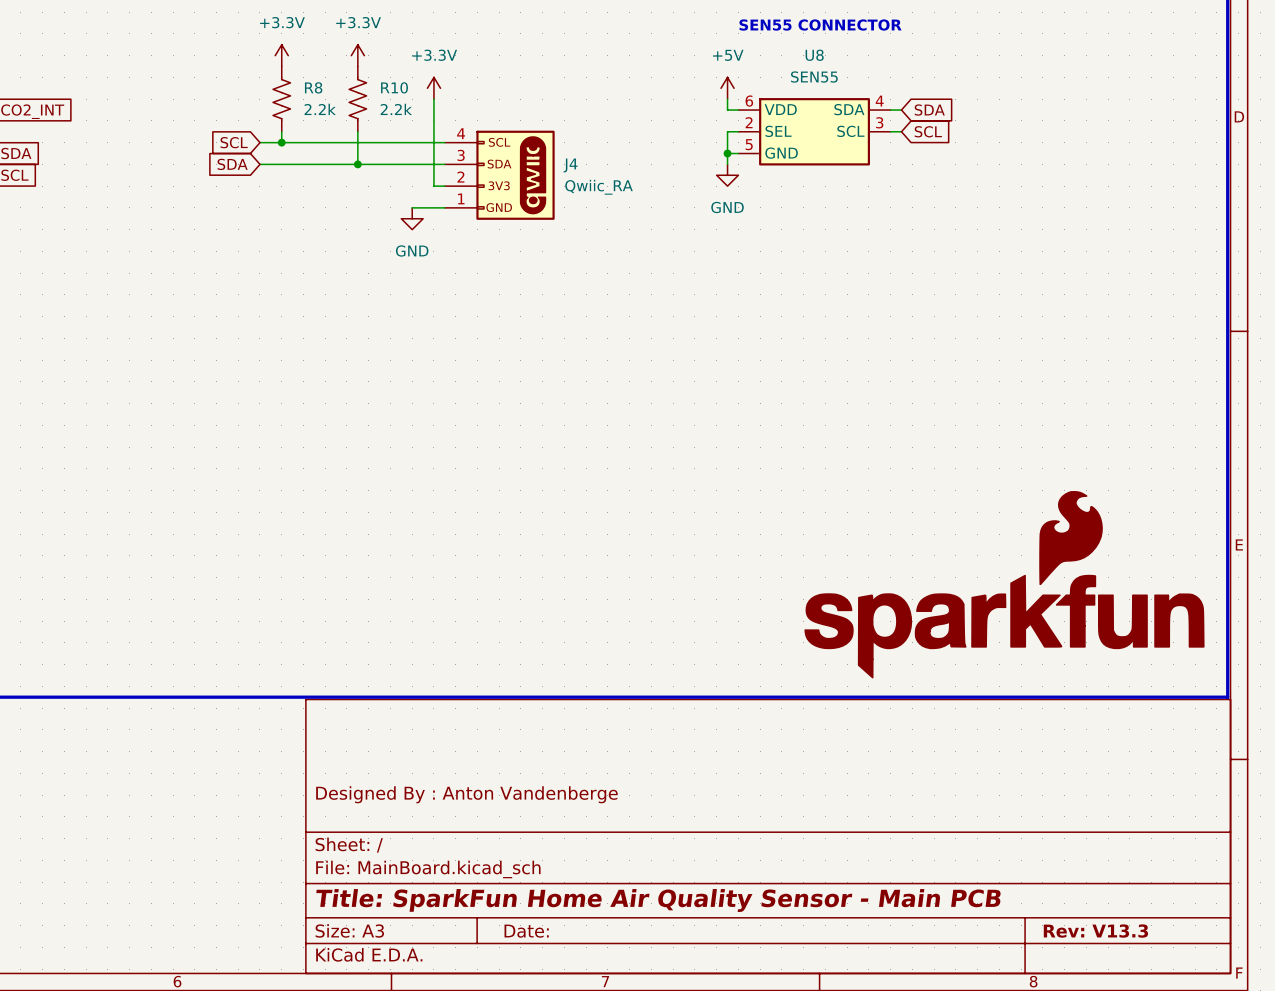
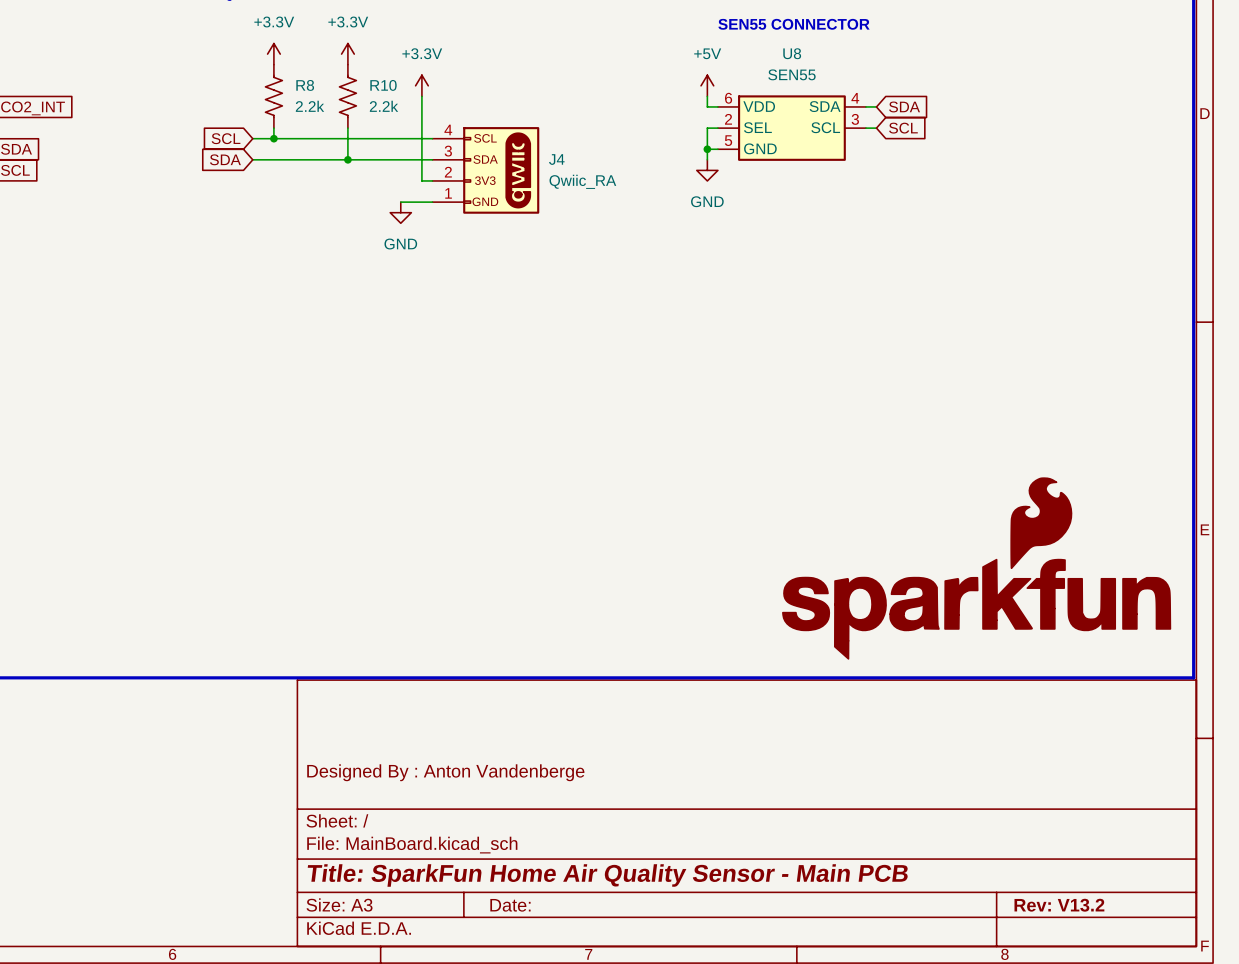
title block: Rev: V13.3 (1095, 931) -> Rev: V13.2 (1059, 905)

